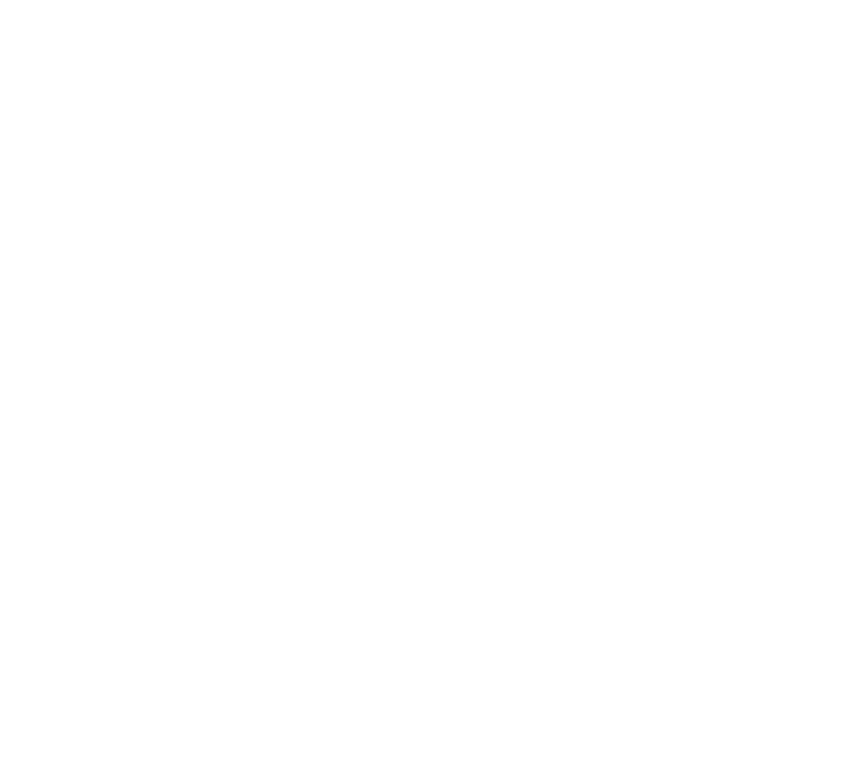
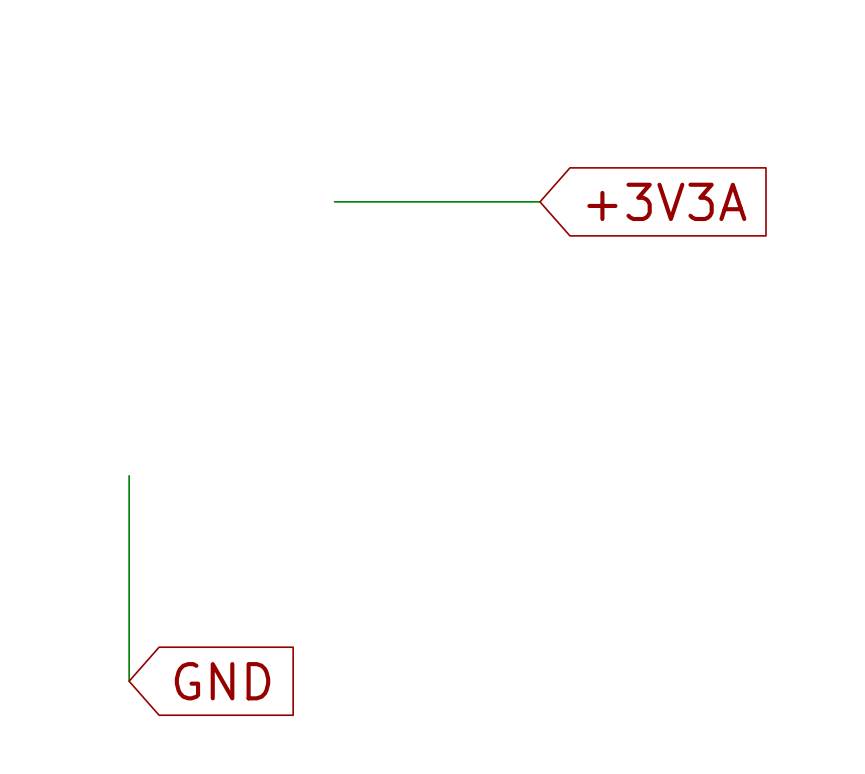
wire: none -> (334, 201) (540, 201)
global label: none -> +3V3A (666, 201)
wire: none -> (129, 475) (129, 681)
global label: none -> GND (222, 681)

